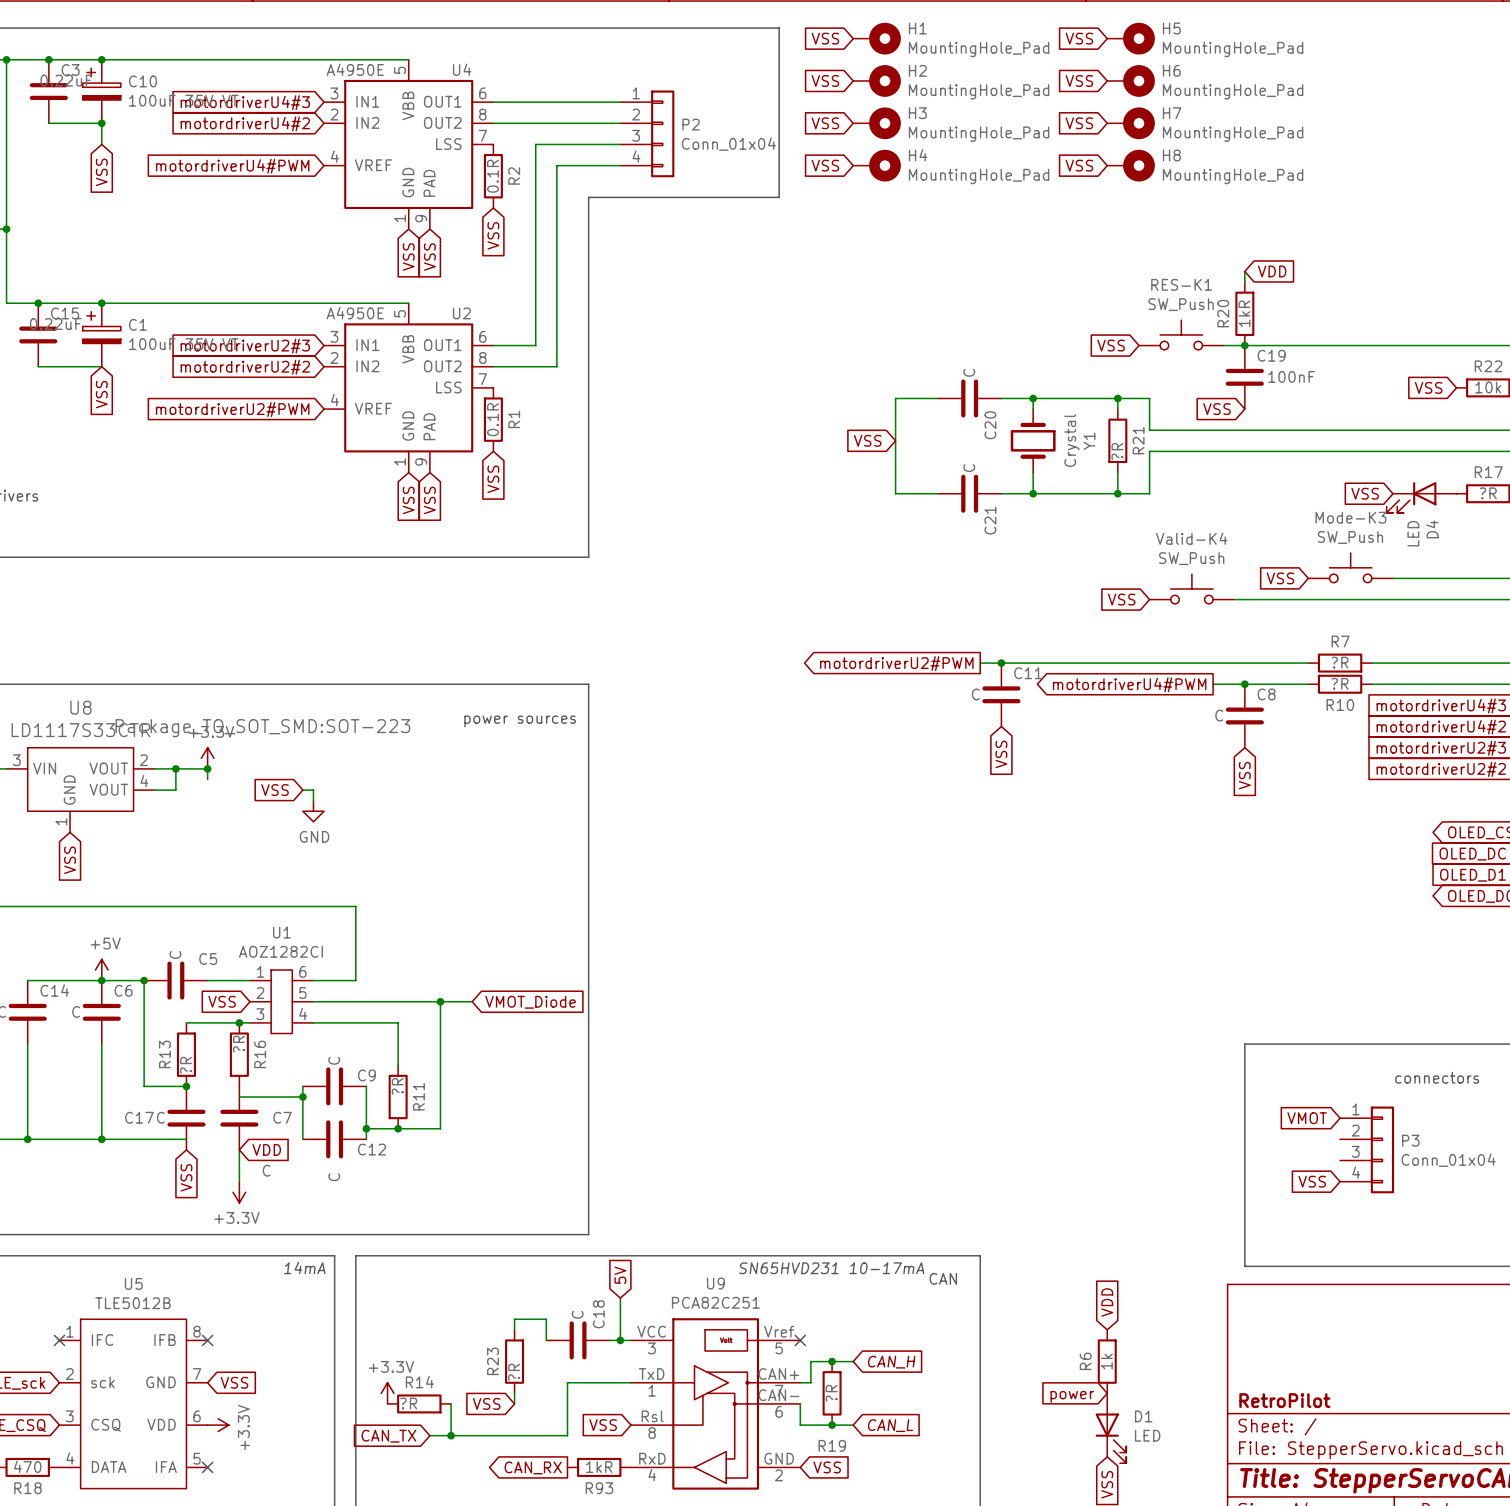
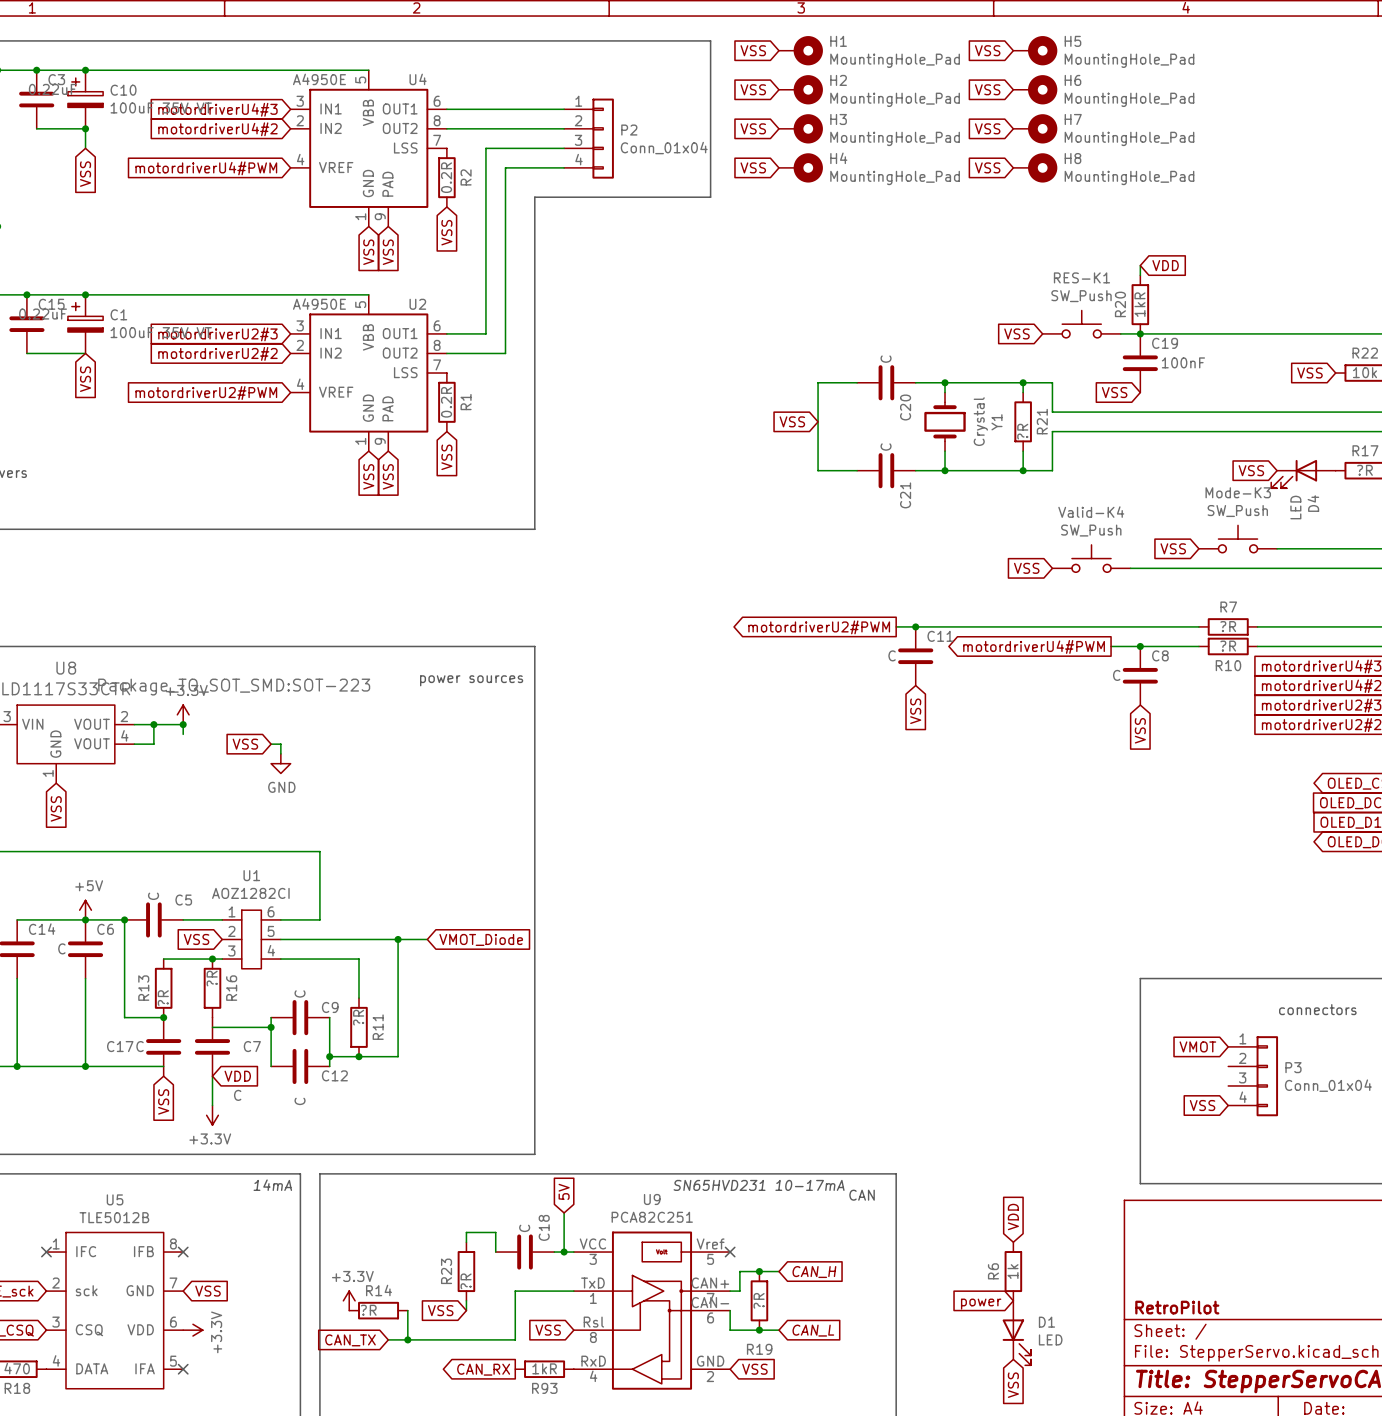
R2 value: 0.1R (492, 176) -> 0.2R (446, 177)
R1 value: 0.1R (492, 419) -> 0.2R (446, 402)

